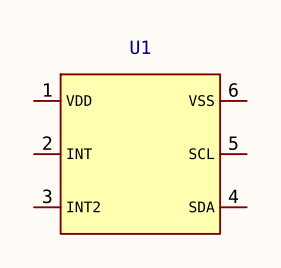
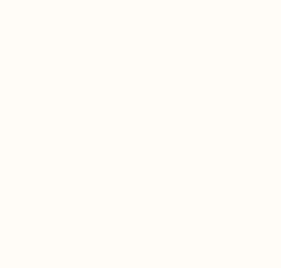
U1: (140, 154) -> none

